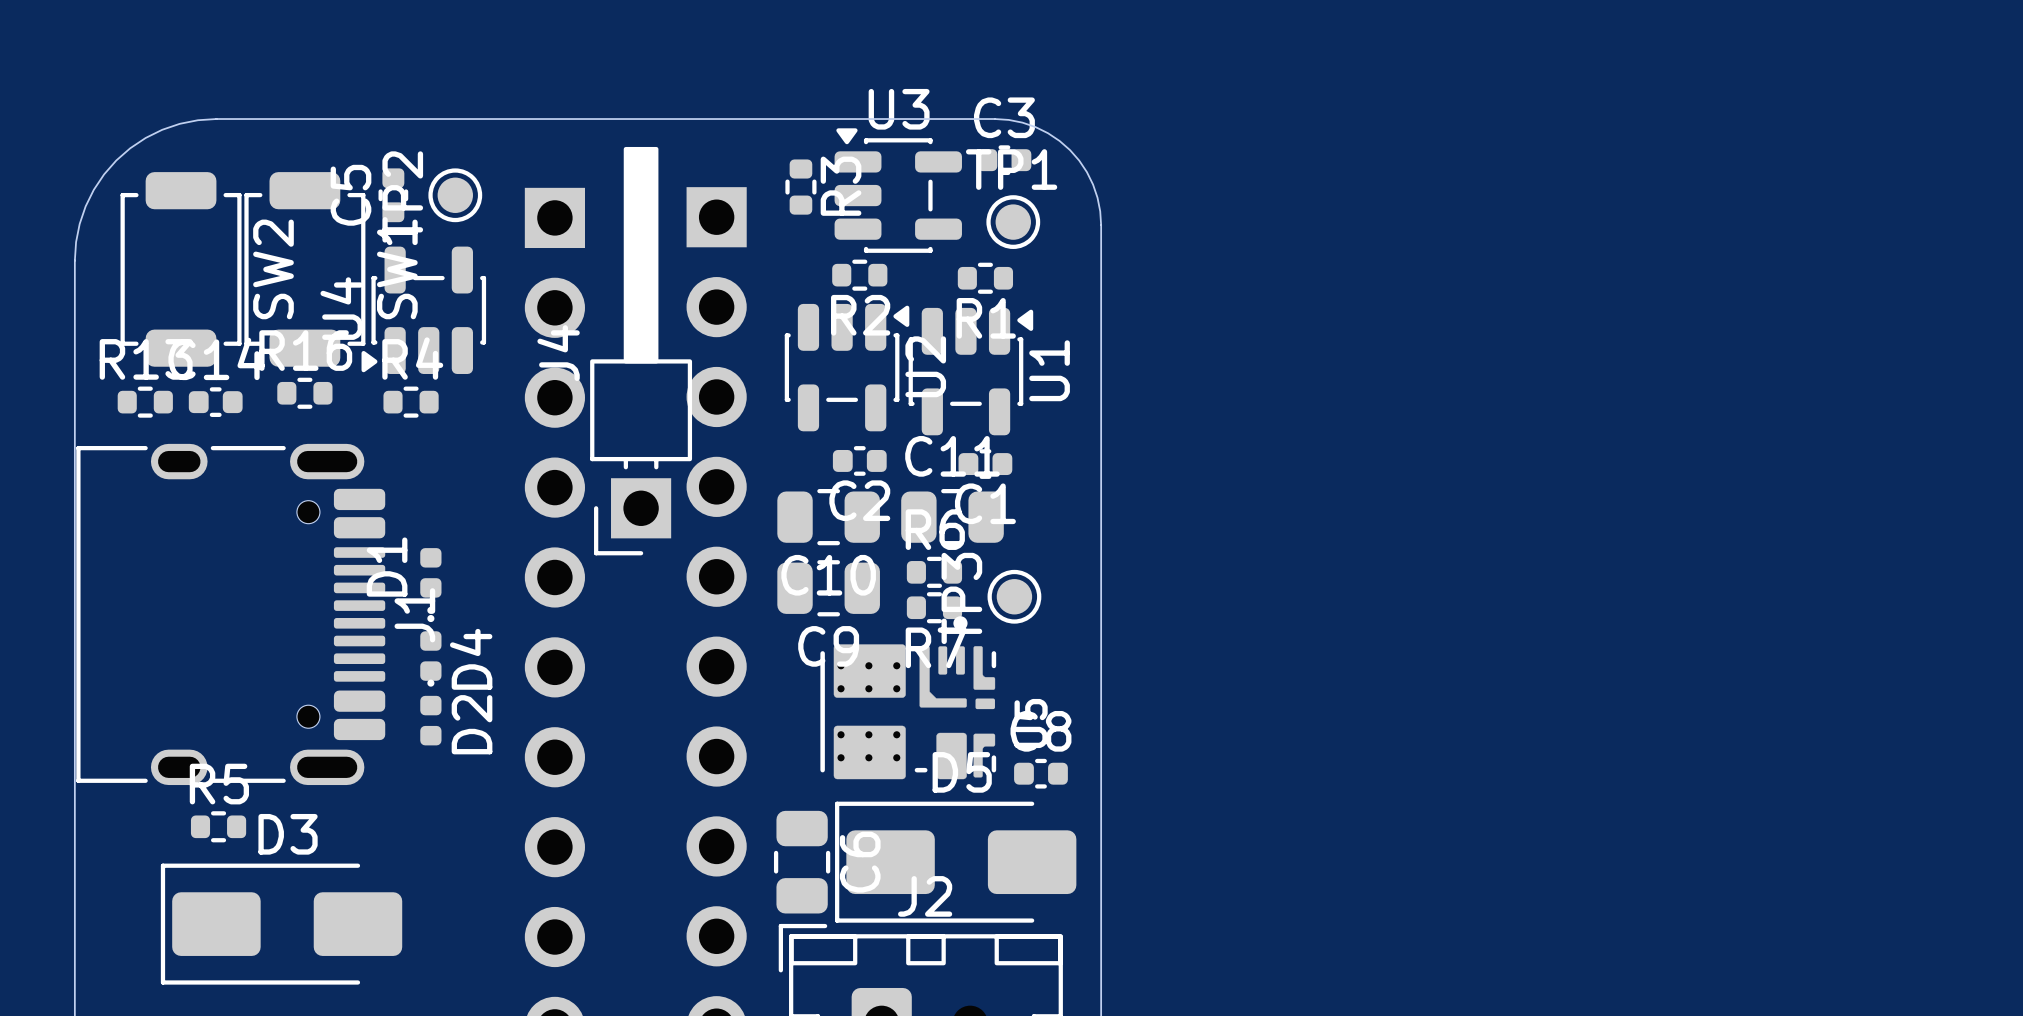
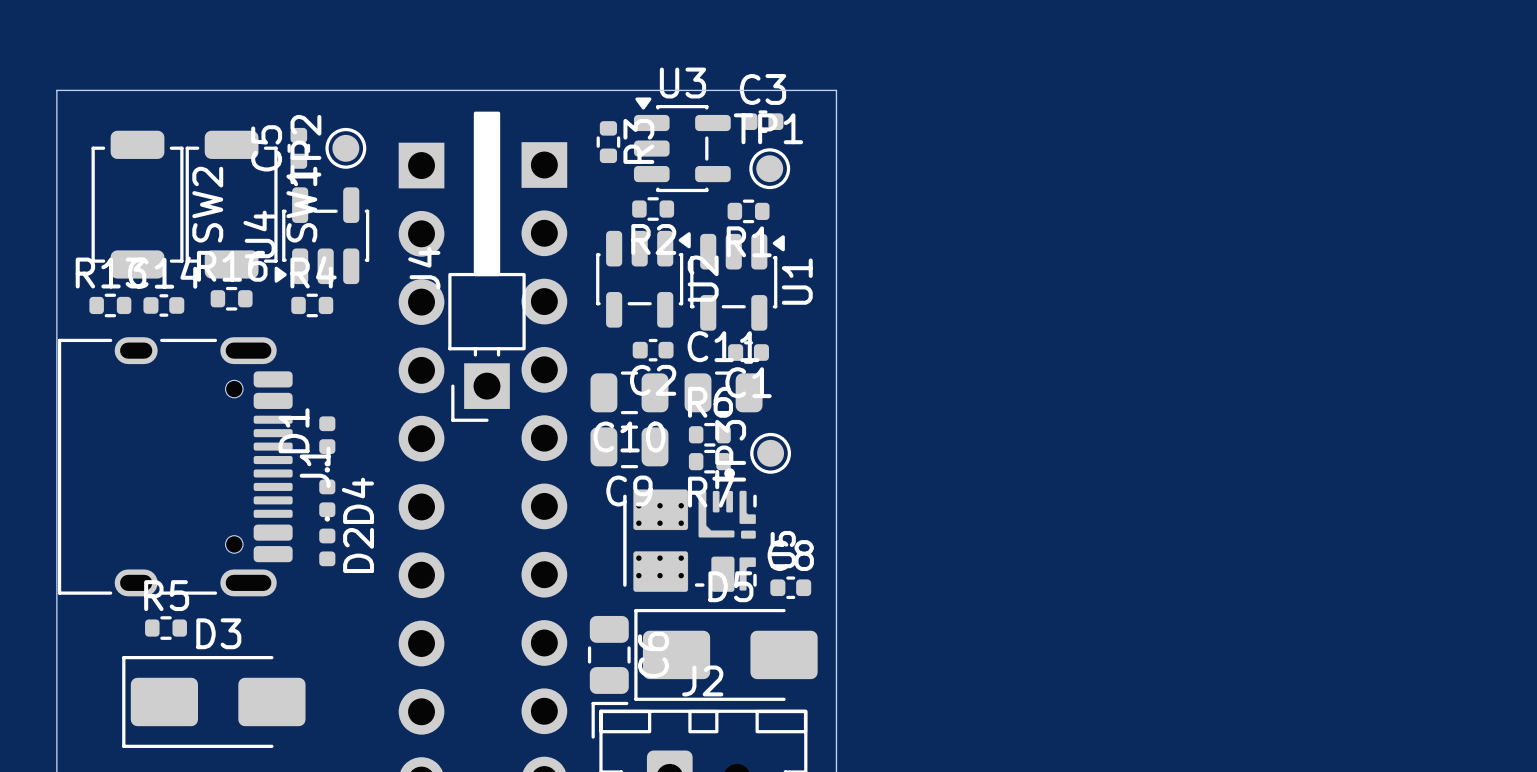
board edge: (216, 119) (179, 123) (162, 129) (145, 137) (116, 160) (93, 189) (85, 206) (79, 223) (74, 260) -> (164, 90) (56, 90) (56, 197)
board edge: (994, 119) (1022, 122) (1035, 127) (1059, 140) (1070, 150) (1086, 172) (1093, 184) (1097, 197) (1101, 225) -> (755, 90) (836, 90) (836, 171)

